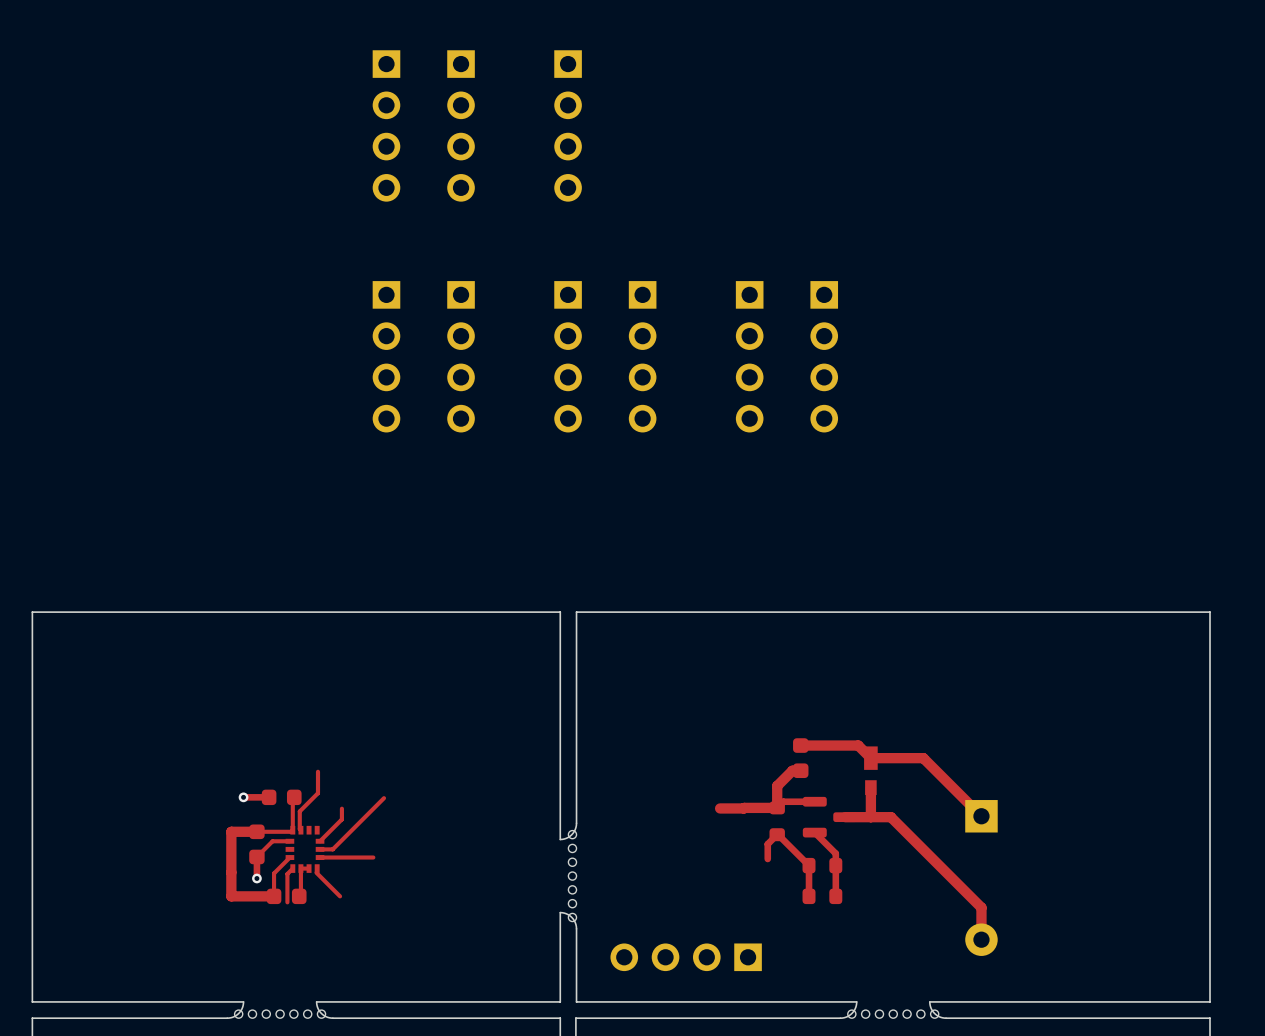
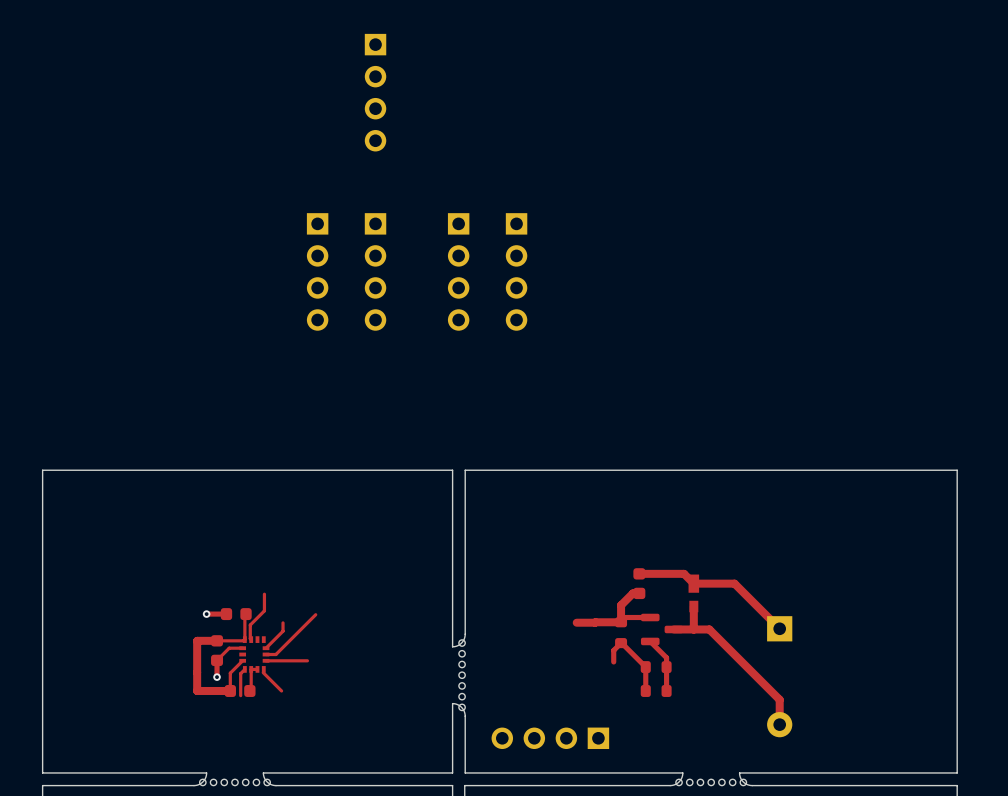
part: (386, 125) -> none
part: (568, 125) -> none
part: (749, 356) -> none
part: (824, 356) -> none

